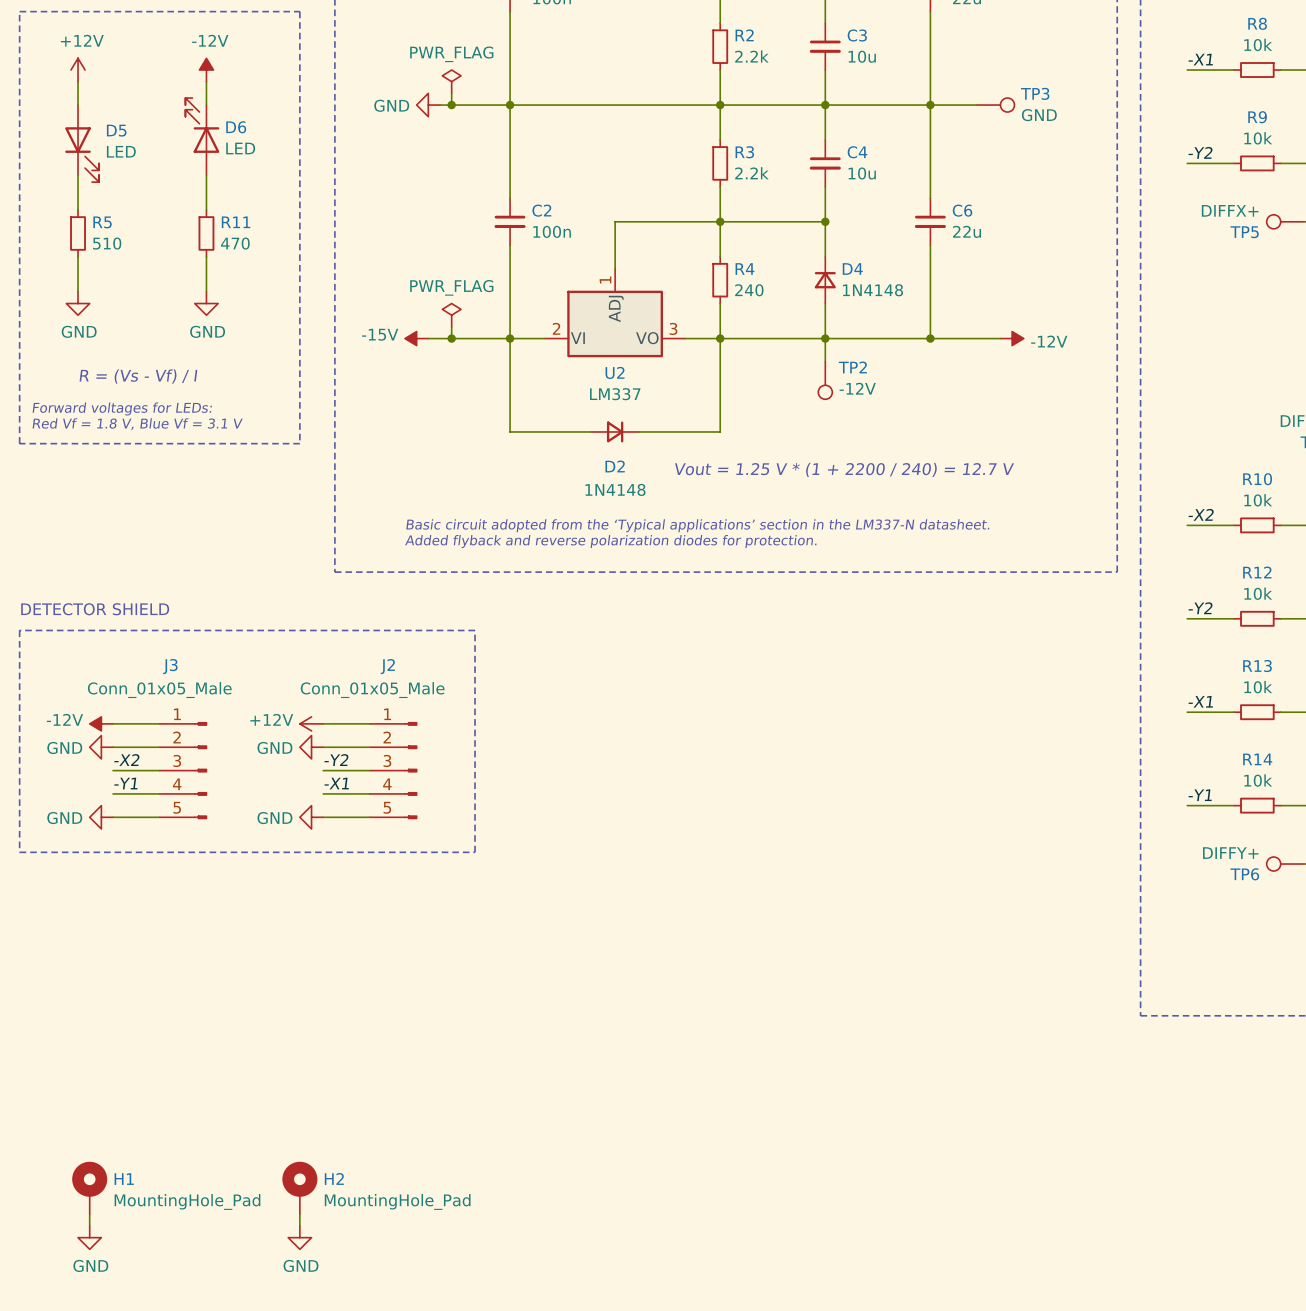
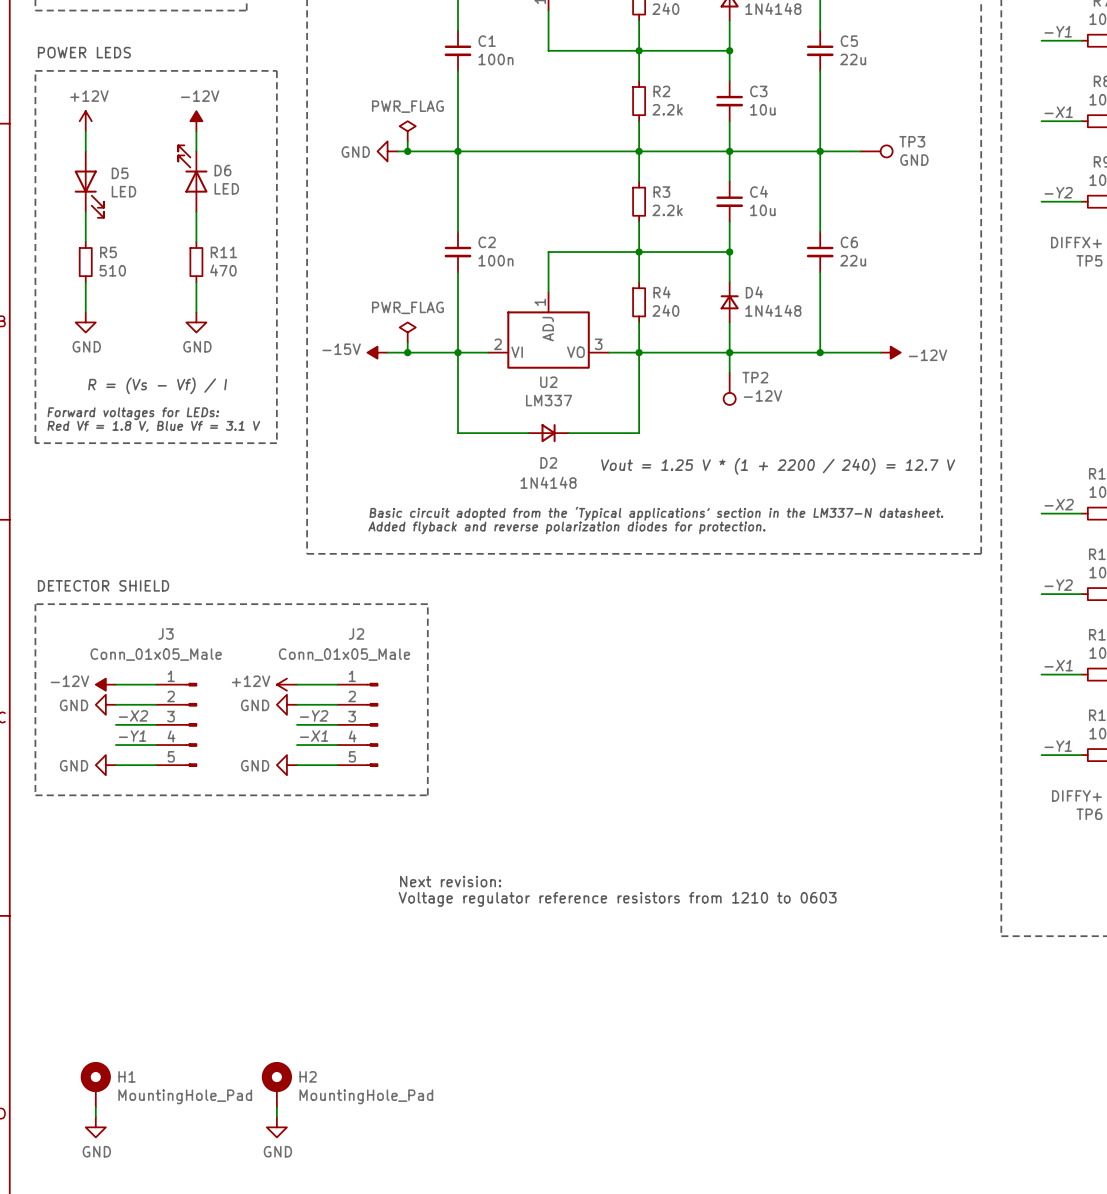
text: none -> Next revision: (450, 881)
text: none -> Voltage regulator reference resistors from 1210 to 0603 (617, 899)

